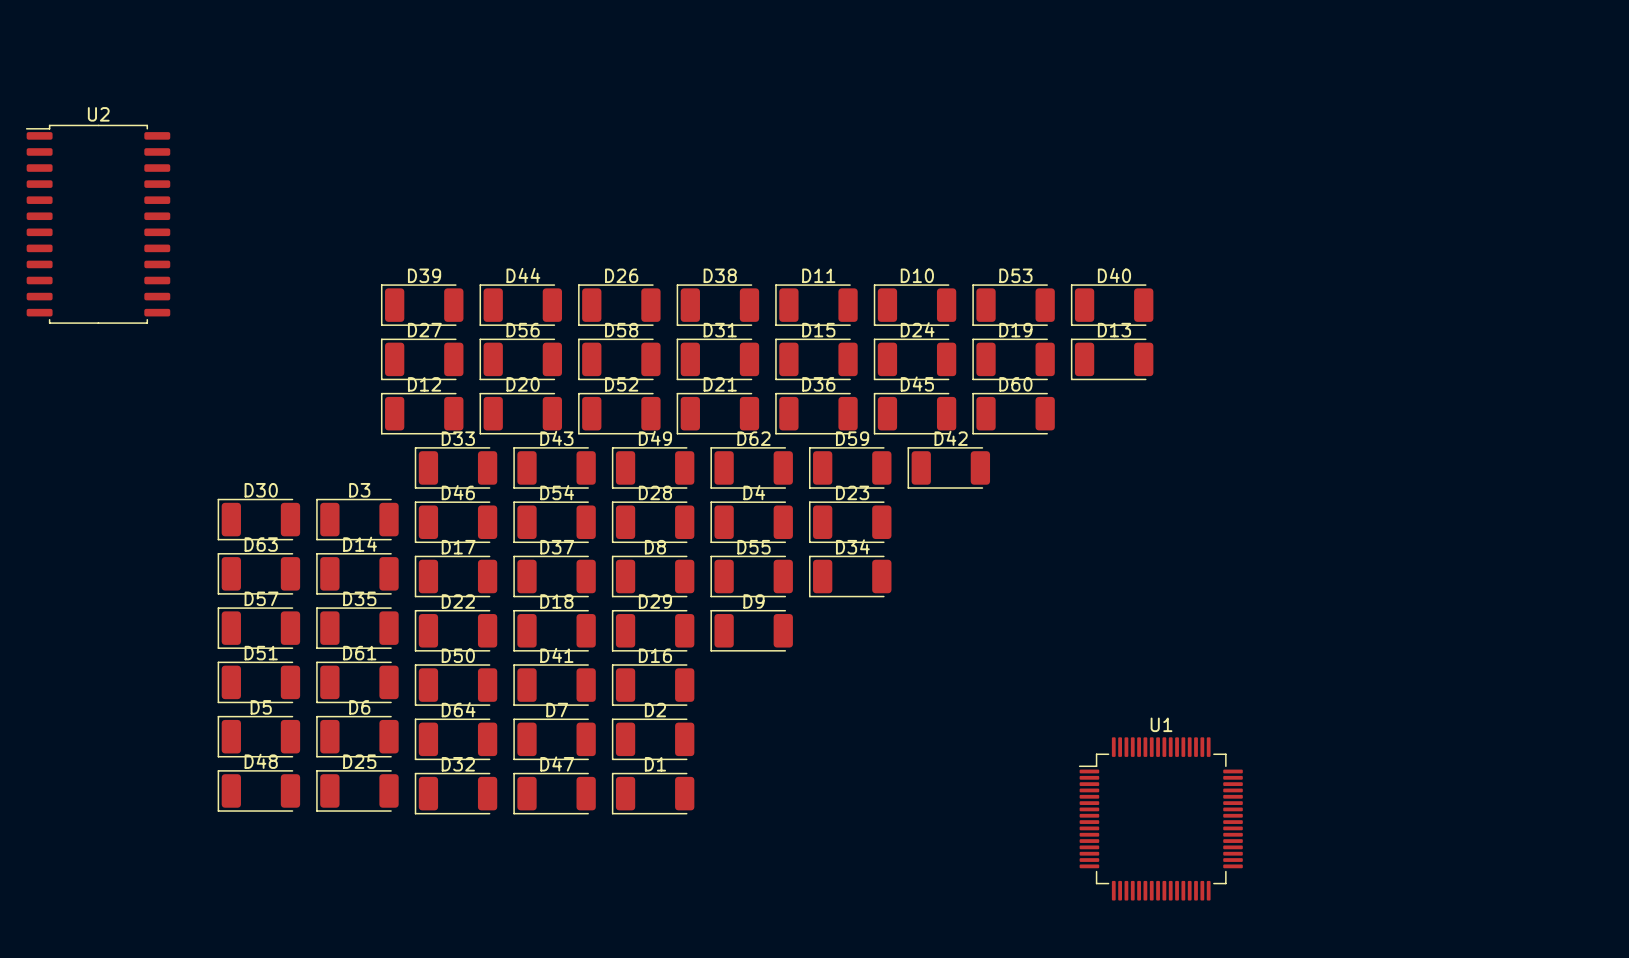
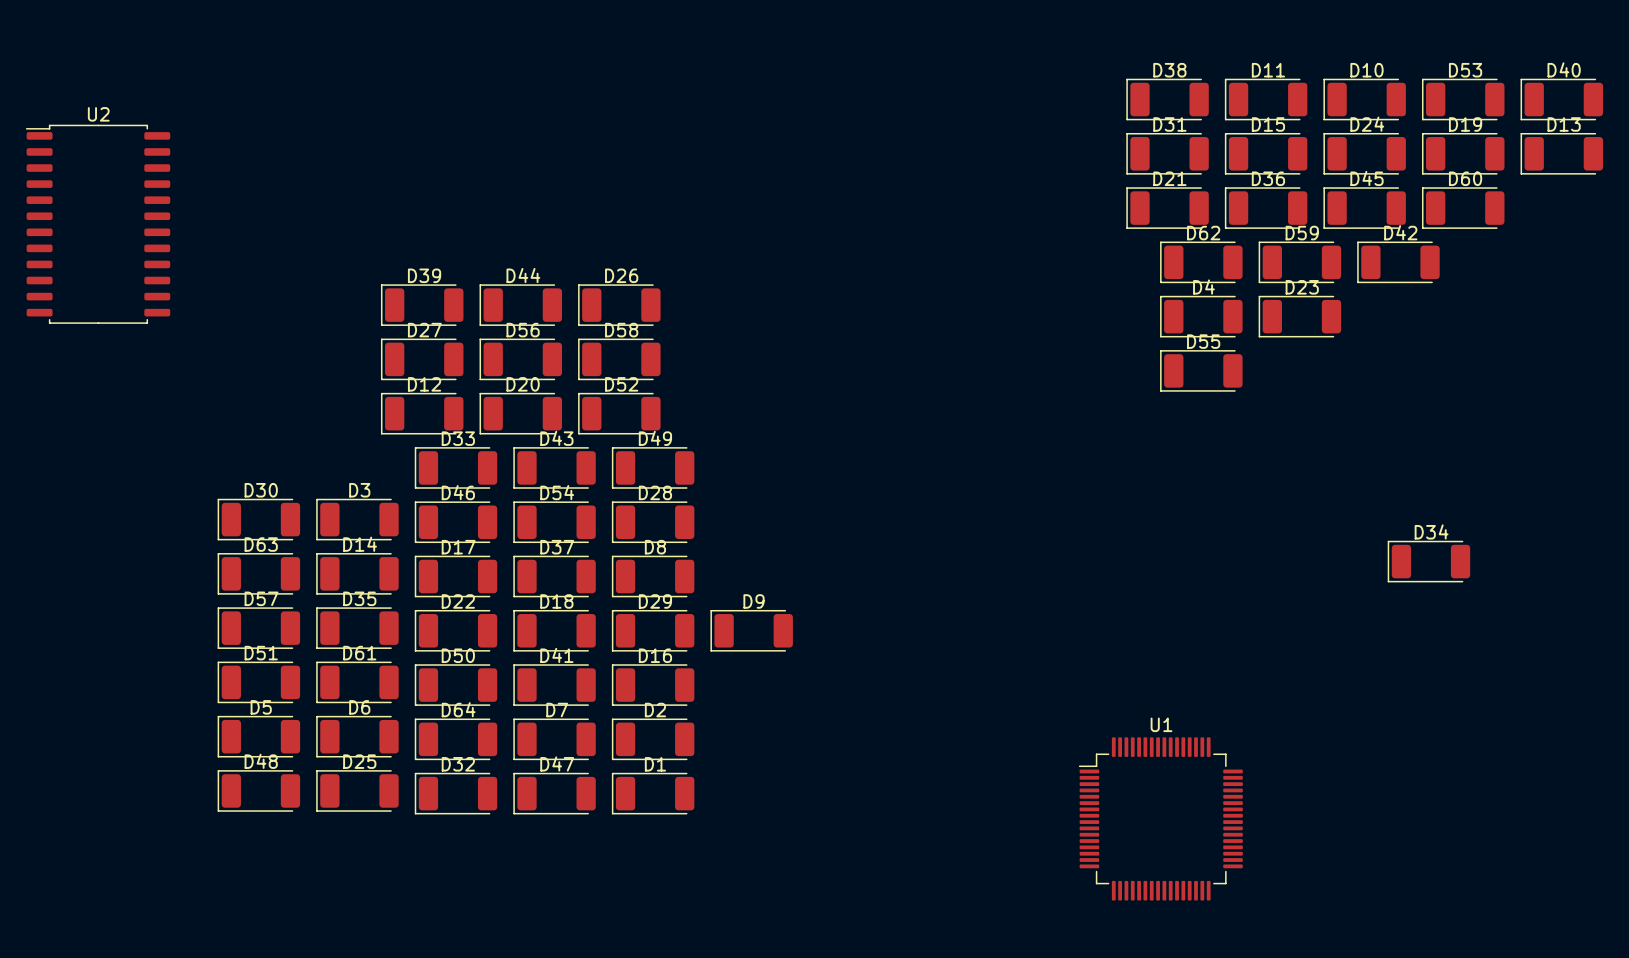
D38 position: (717, 305) -> (1167, 99)
D11 position: (816, 305) -> (1266, 99)
D10 position: (915, 305) -> (1364, 99)
D53 position: (1013, 305) -> (1463, 99)
D40 position: (1112, 305) -> (1561, 99)
D31 position: (717, 359) -> (1167, 153)
D15 position: (816, 359) -> (1266, 153)
D24 position: (915, 359) -> (1364, 153)
D19 position: (1013, 359) -> (1463, 153)
D13 position: (1112, 359) -> (1561, 153)
D21 position: (717, 413) -> (1167, 208)
D36 position: (816, 413) -> (1266, 208)
D45 position: (915, 413) -> (1364, 208)
D60 position: (1013, 413) -> (1463, 208)
D62 position: (751, 467) -> (1201, 262)
D59 position: (850, 467) -> (1299, 262)
D42 position: (948, 467) -> (1398, 262)
D4 position: (751, 522) -> (1201, 316)
D23 position: (850, 522) -> (1299, 316)
D55 position: (751, 576) -> (1201, 370)
D34 position: (850, 576) -> (1428, 561)

